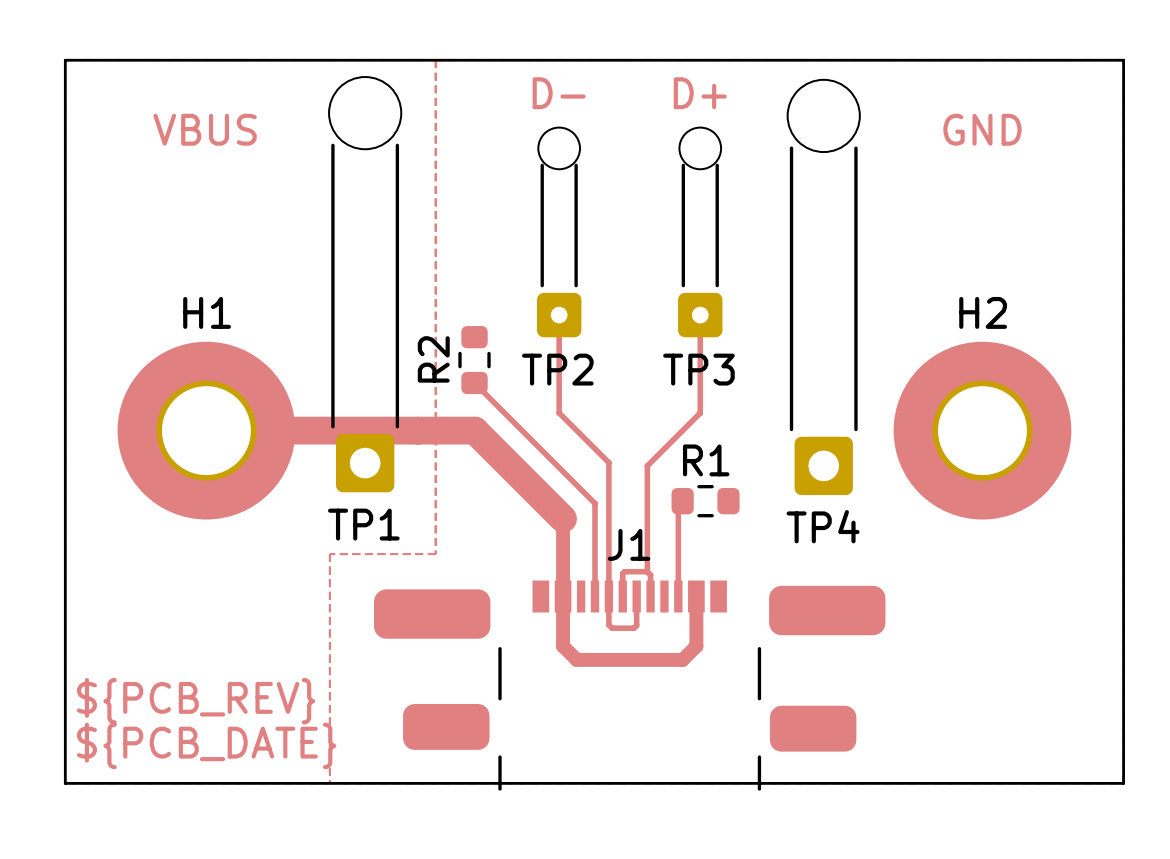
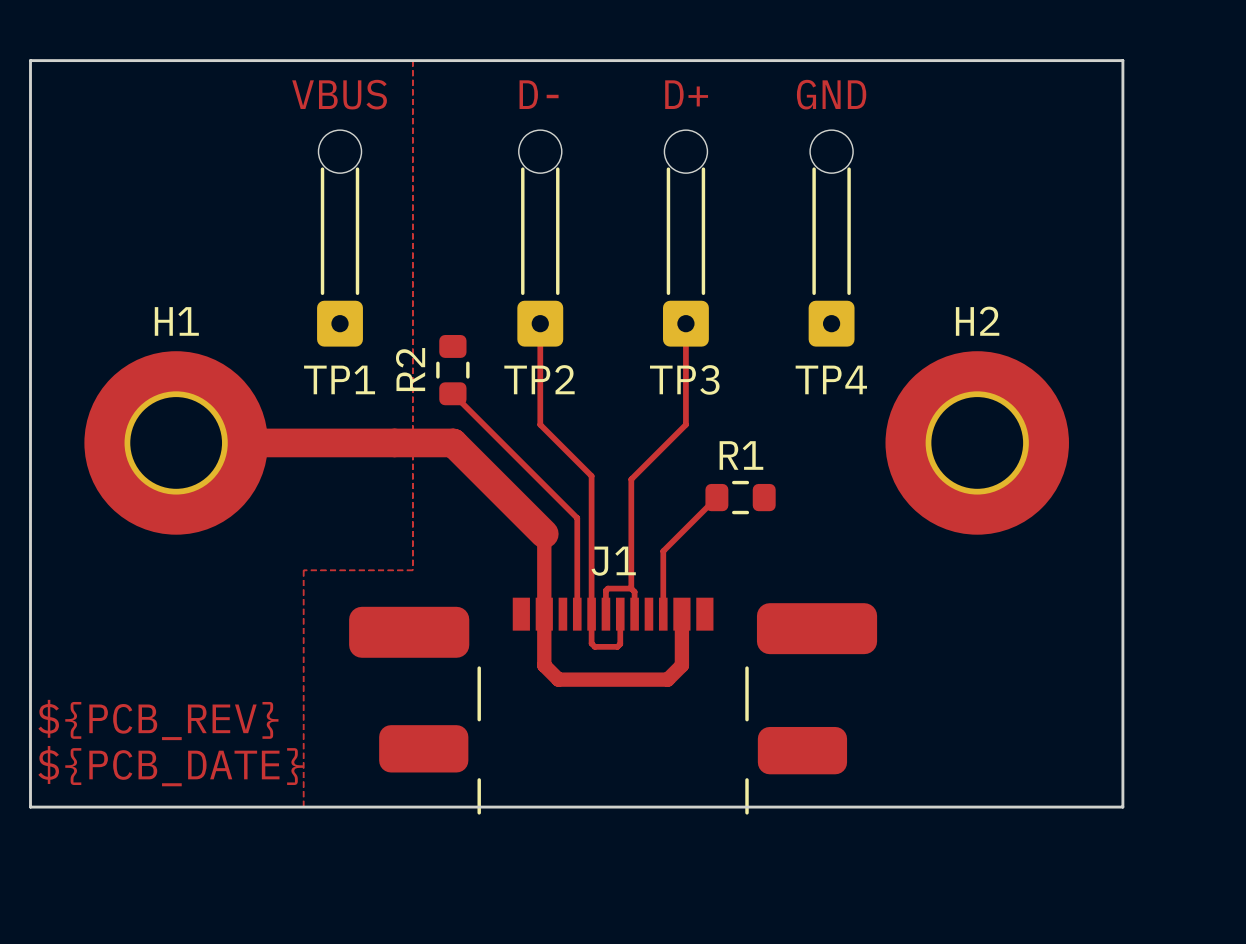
TP1 footprint: [329, 77, 402, 493] -> [317, 130, 363, 347]
TP4 footprint: [787, 79, 860, 496] -> [808, 130, 855, 347]
TP1 value position: VBUS (205, 129) -> VBUS (339, 94)
TP4 value position: GND (982, 129) -> GND (831, 94)
top track: (682, 501) (678, 505) (678, 535) -> (716, 497) (663, 551)
R1 position: (705, 501) -> (740, 497)
TP1 name position: TP1 (363, 524) -> TP1 (339, 379)
TP4 name position: TP4 (823, 526) -> TP4 (831, 379)

